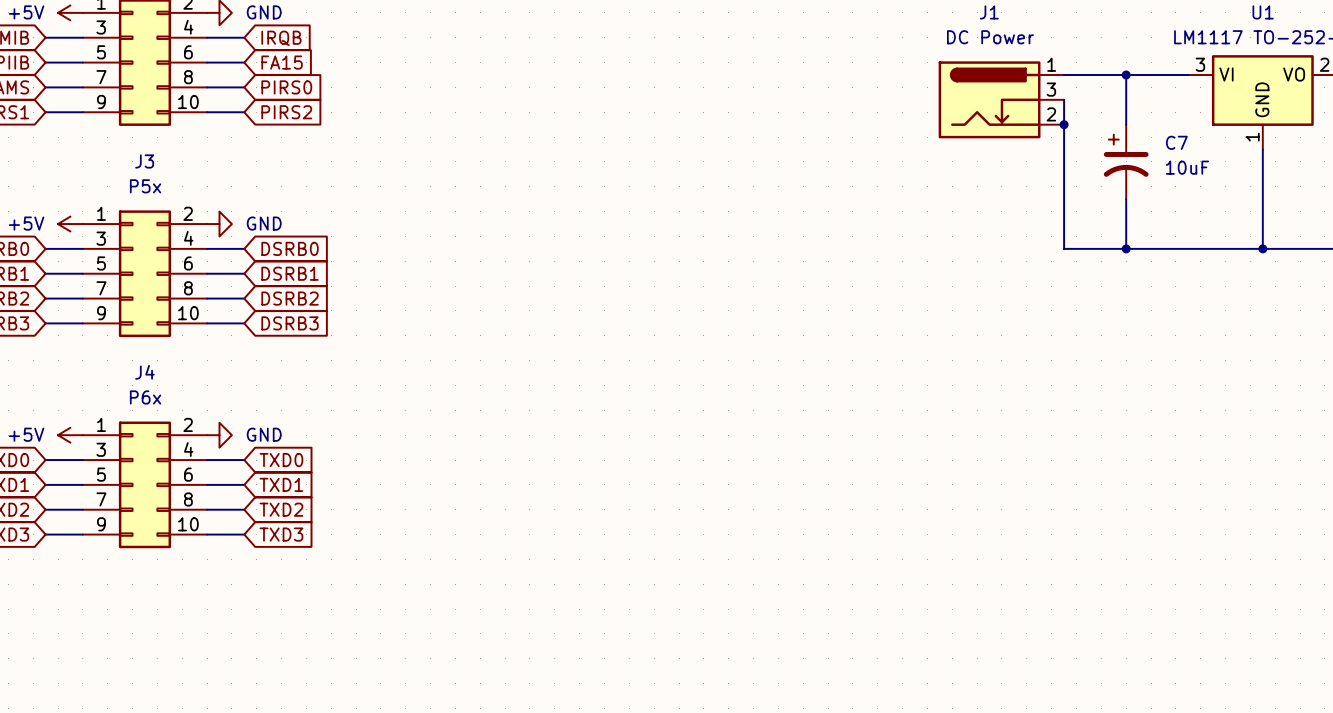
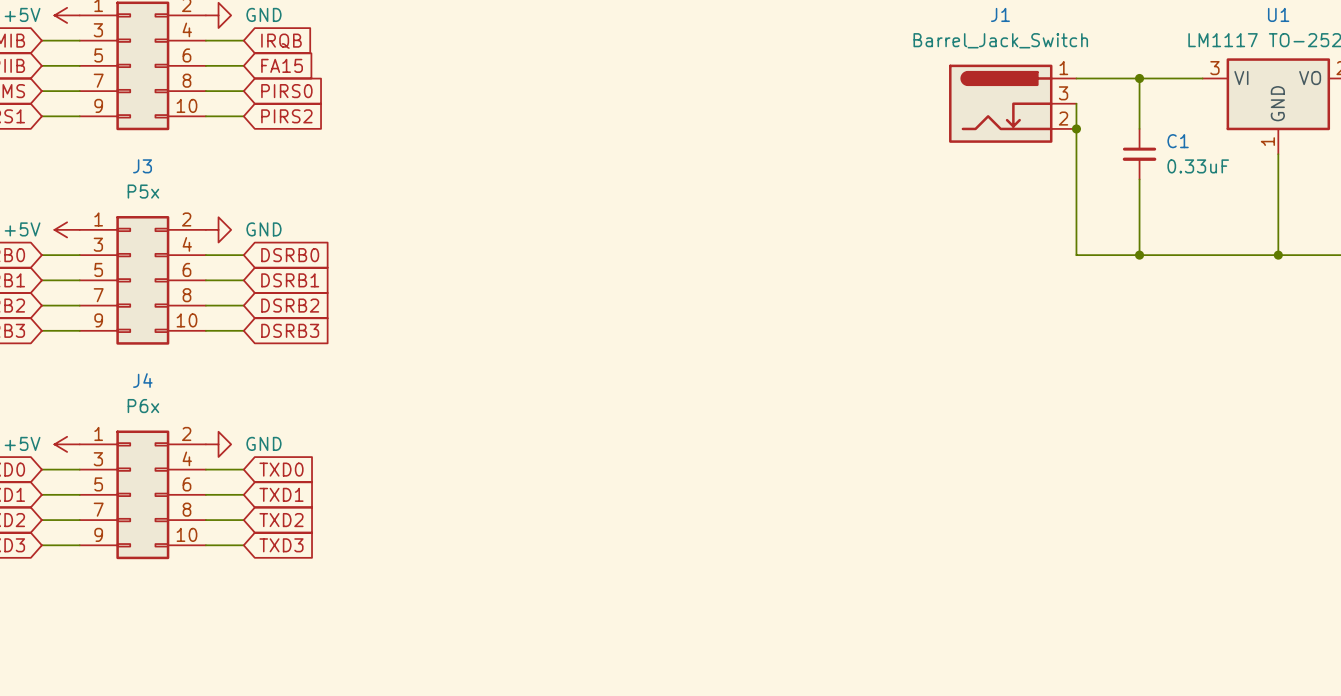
J1 value: DC Power (990, 37) -> Barrel_Jack_Switch (1000, 40)
C1: none -> 0.33uF (1139, 154)
C7: 10uF (1126, 161) -> none

